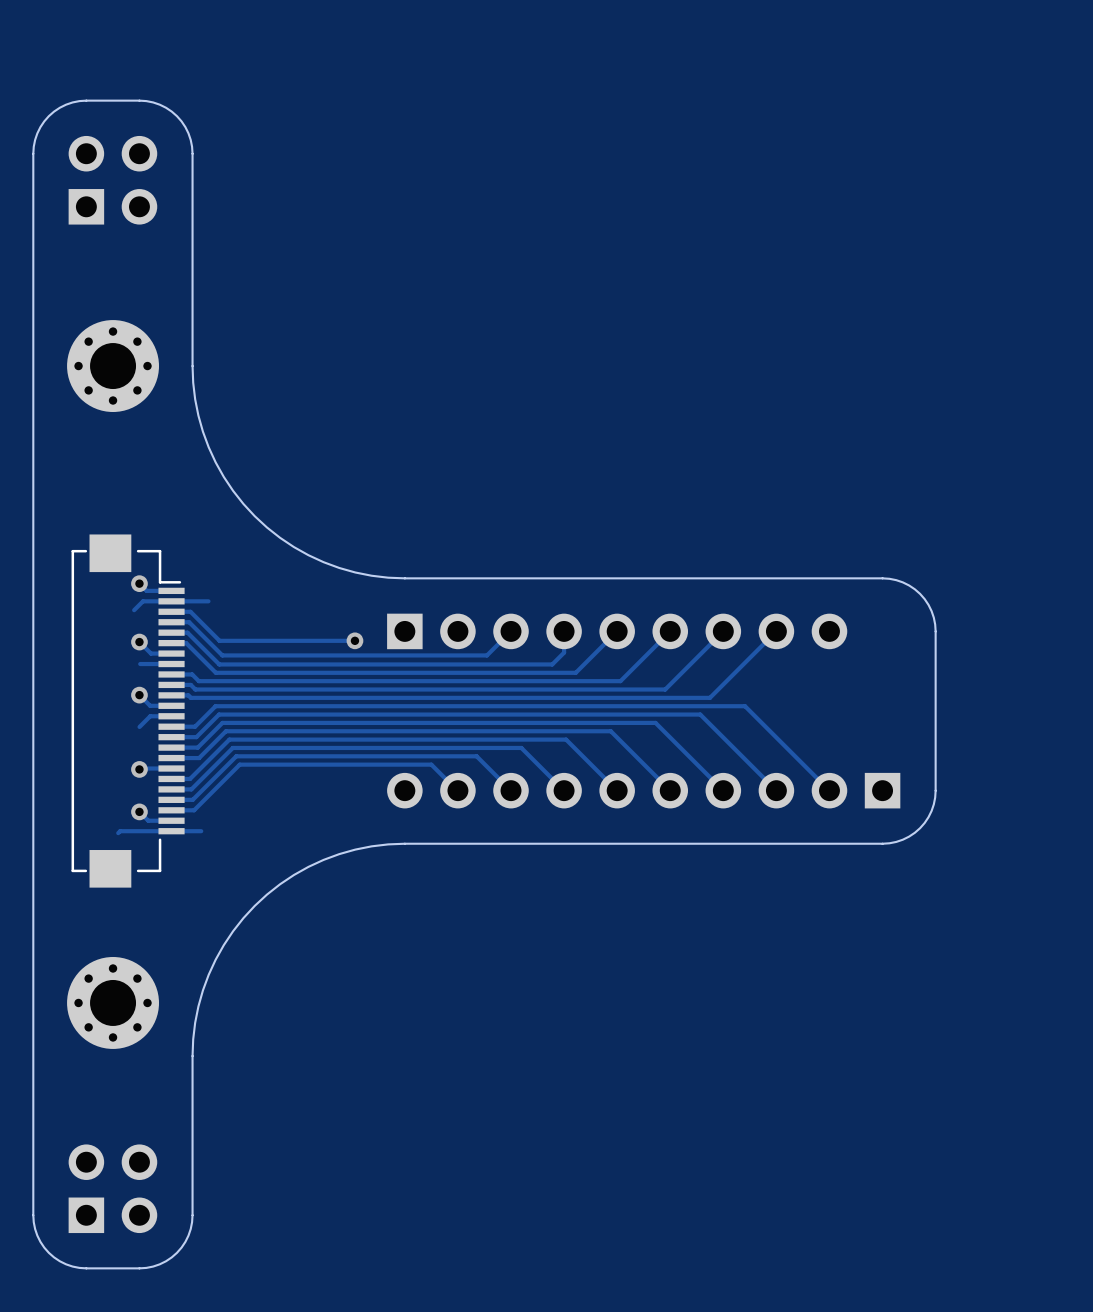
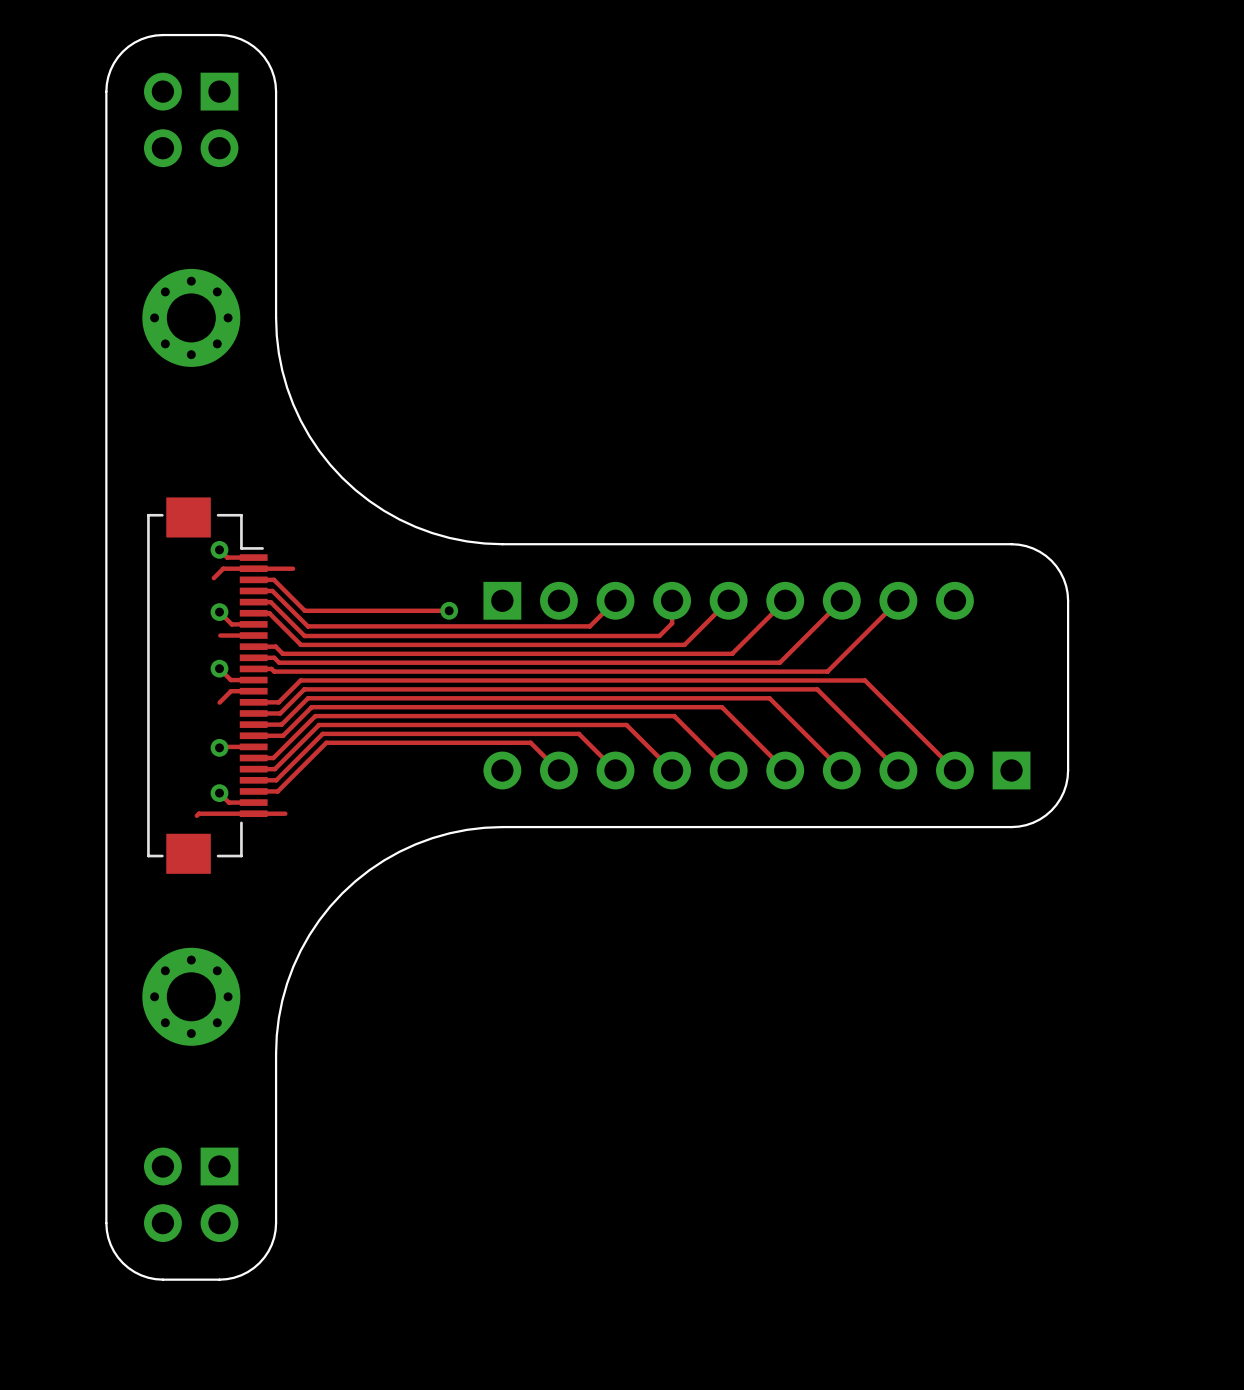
part rotation: 0° (112, 180) -> 180° (191, 119)
part rotation: 0° (112, 1188) -> 180° (191, 1194)

